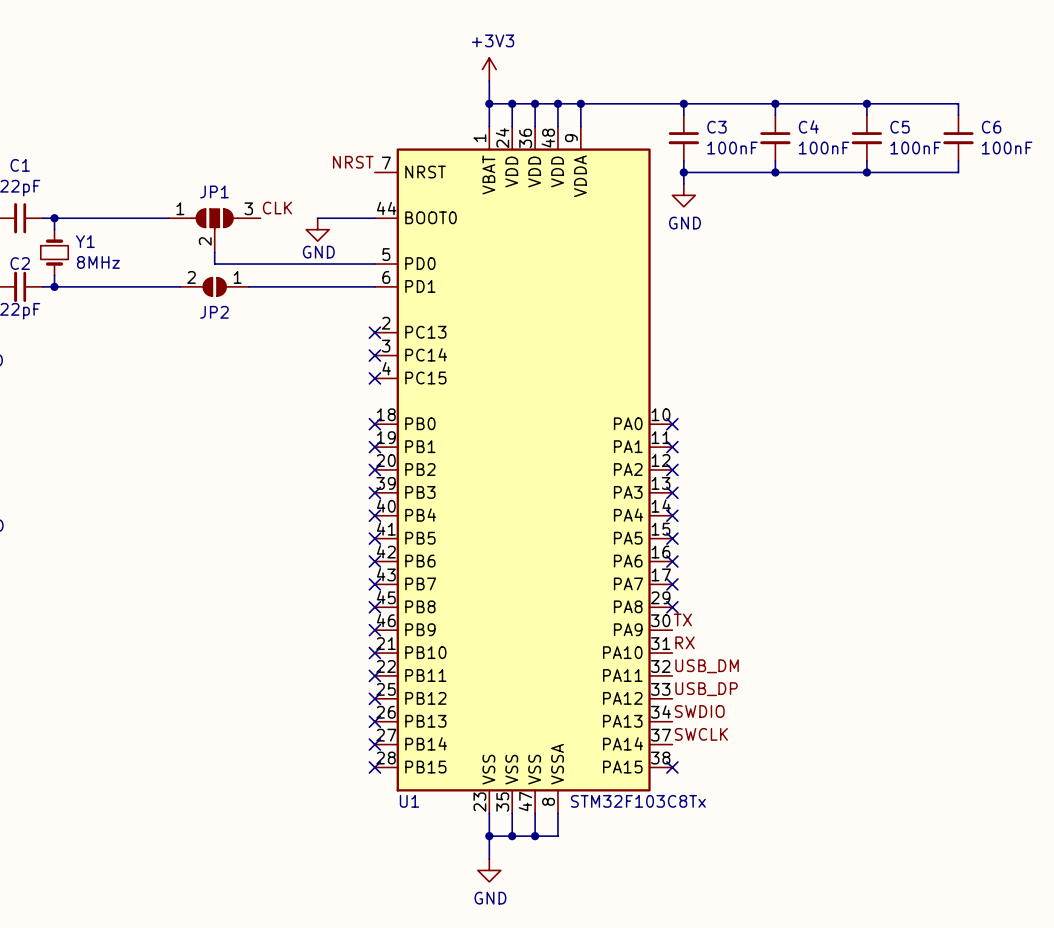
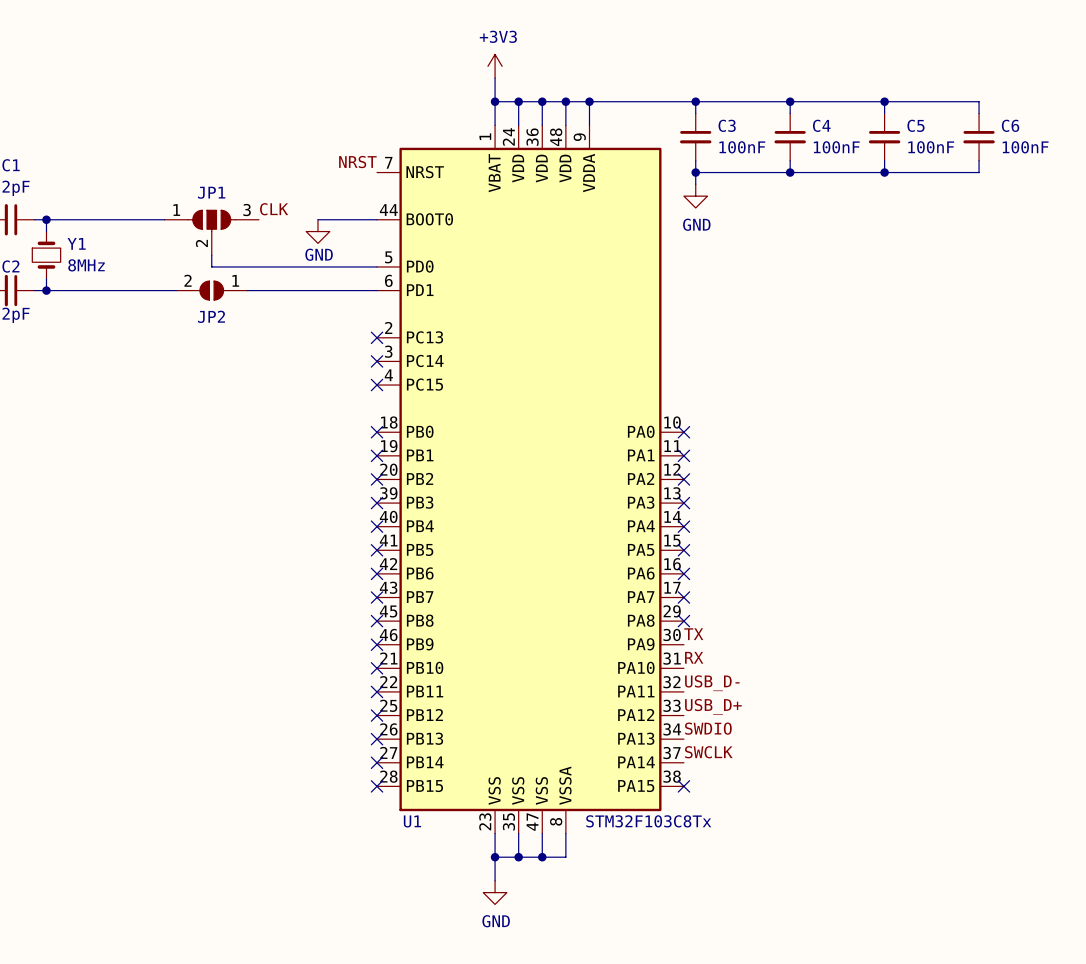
label: USB_DM (707, 666) -> USB_D- (712, 683)
label: USB_DP (706, 689) -> USB_D+ (713, 706)

